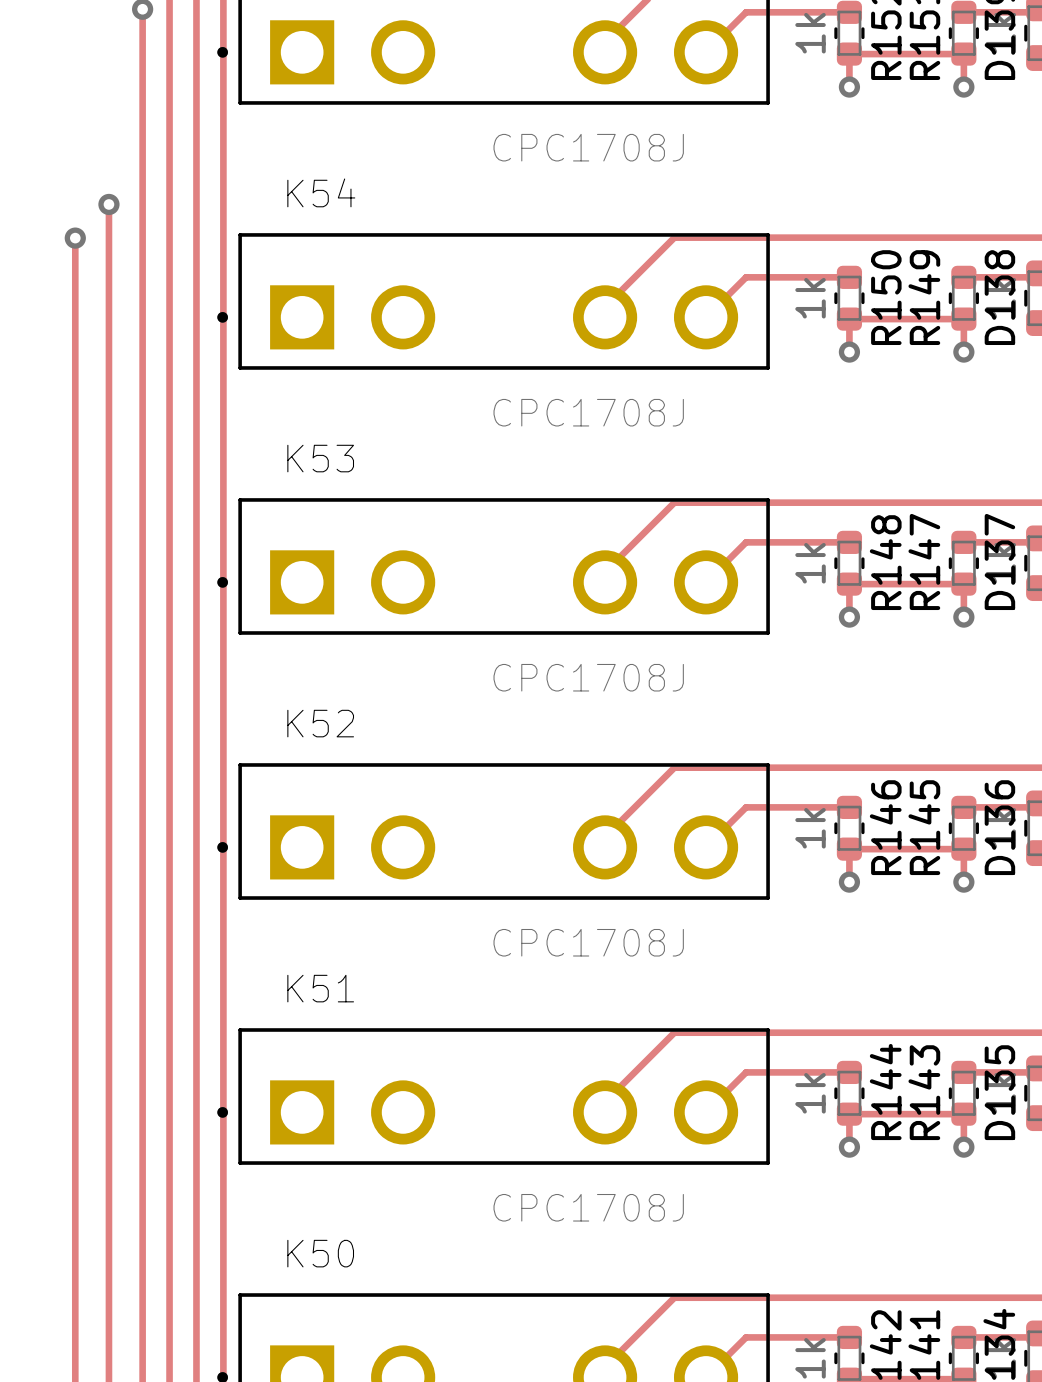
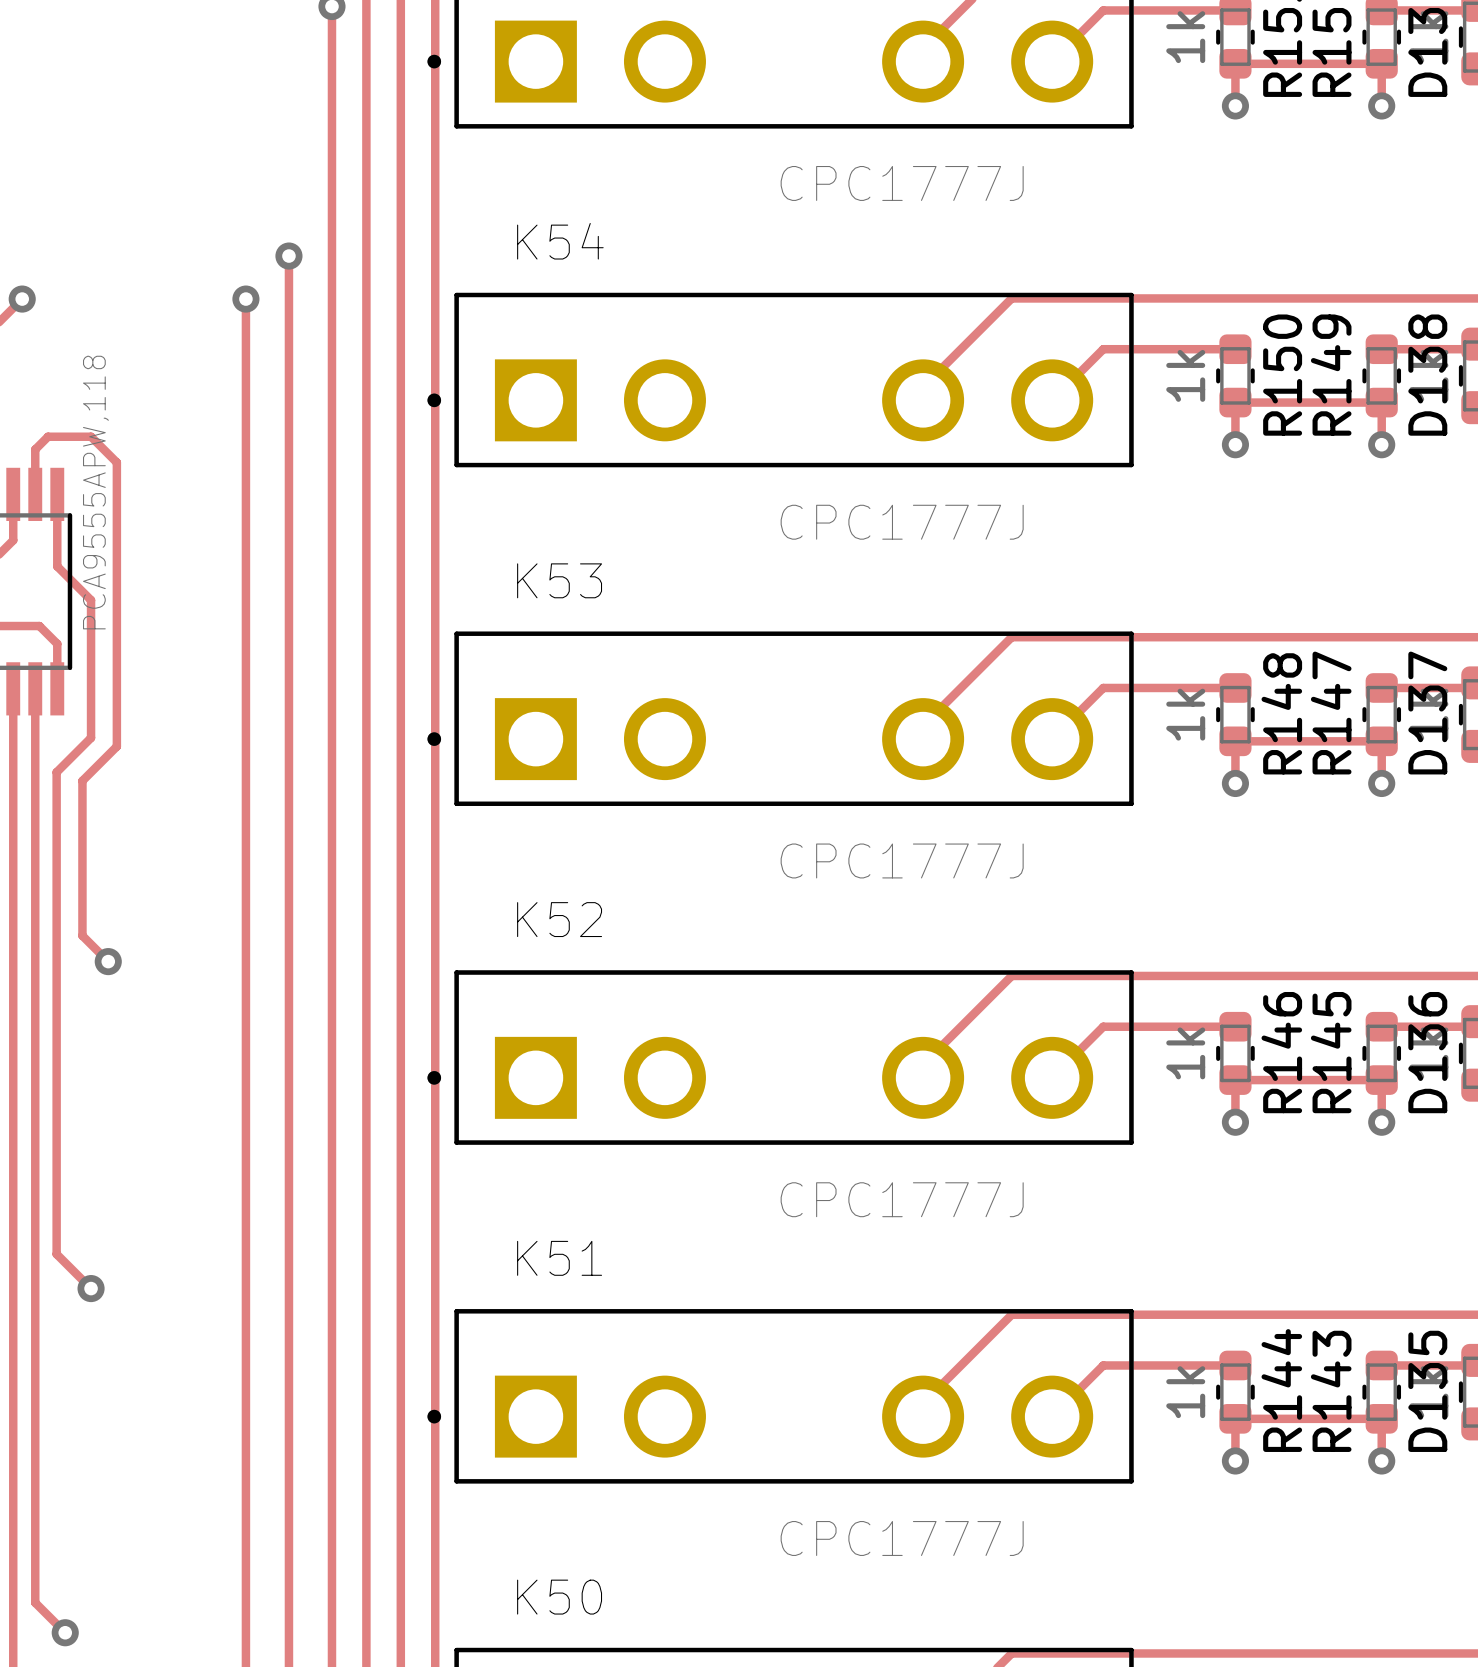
part value: CPC1708J (588, 147) -> CPC1777J (902, 183)
K54 value: CPC1708J (588, 412) -> CPC1777J (902, 522)
K53 value: CPC1708J (588, 677) -> CPC1777J (902, 860)
K52 value: CPC1708J (588, 942) -> CPC1777J (902, 1199)
K51 value: CPC1708J (588, 1207) -> CPC1777J (902, 1538)

